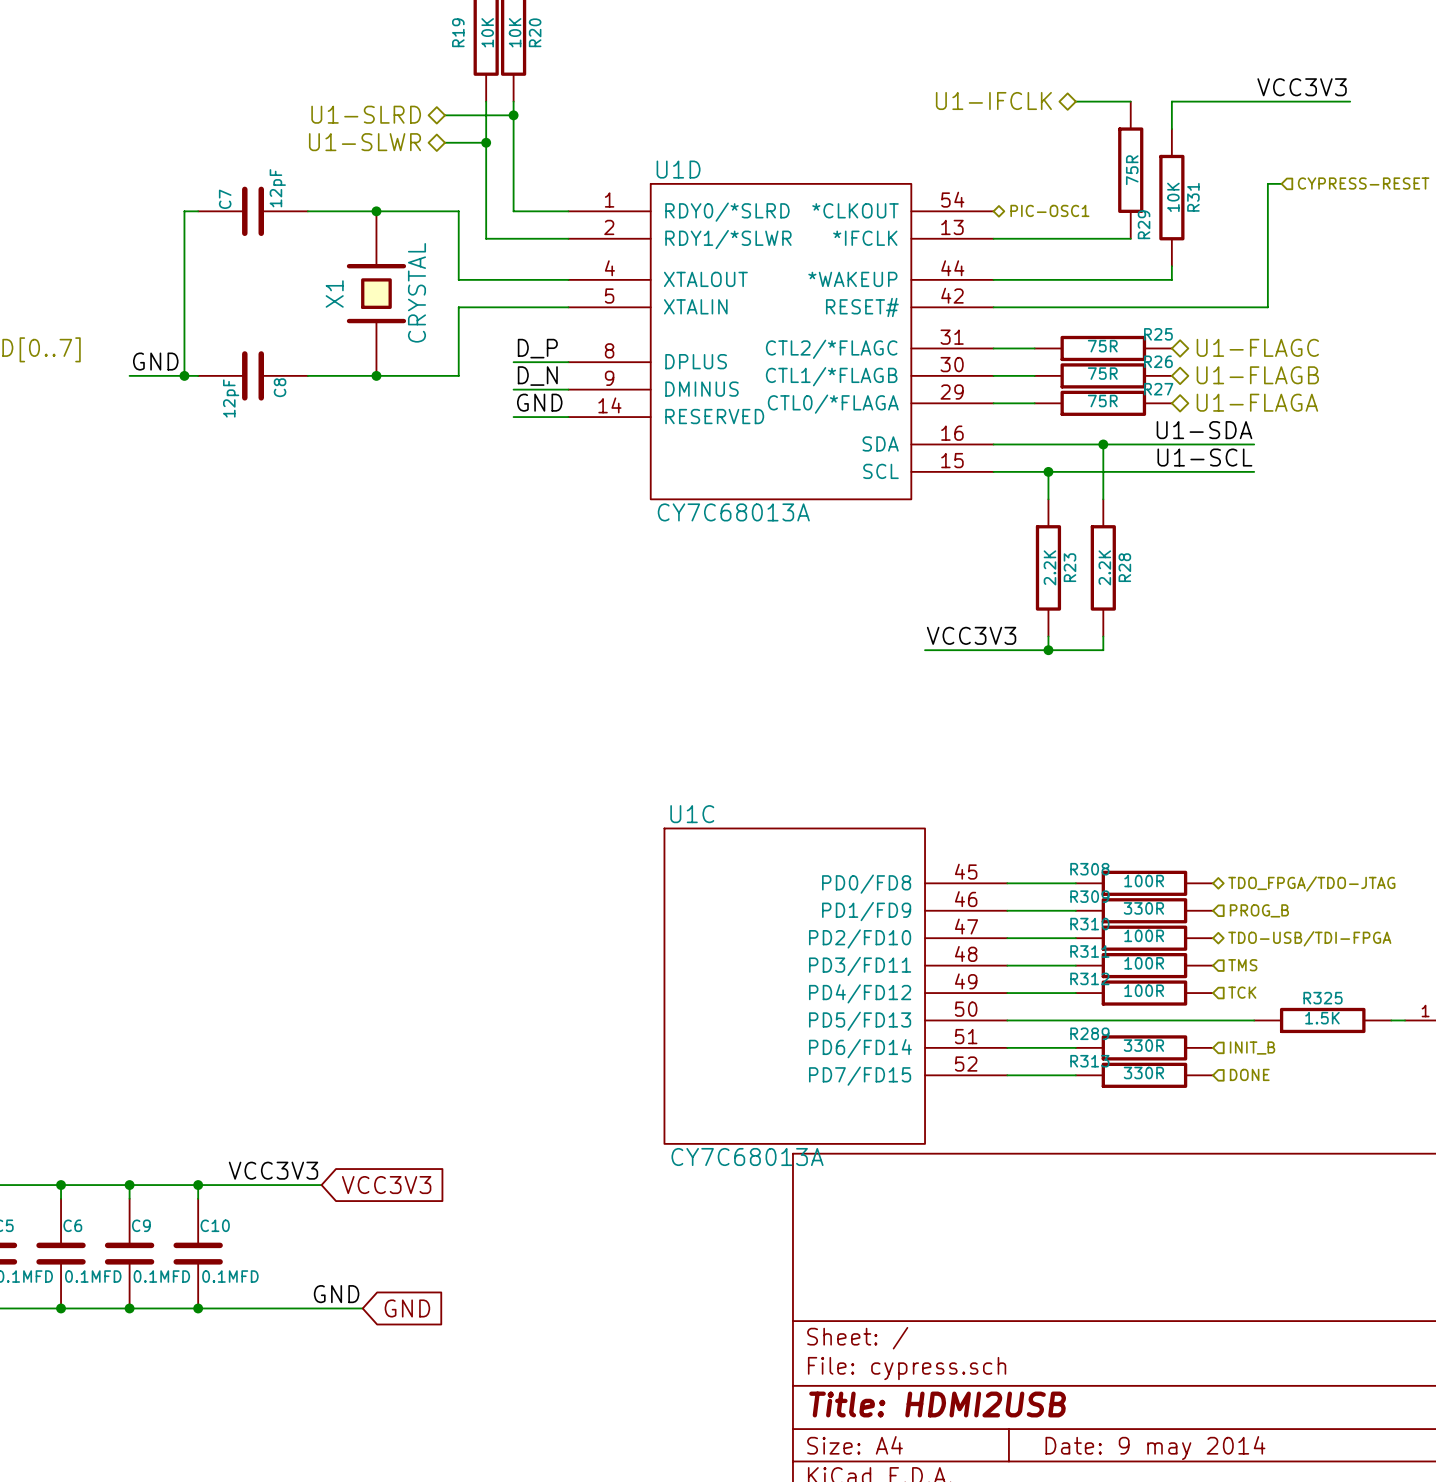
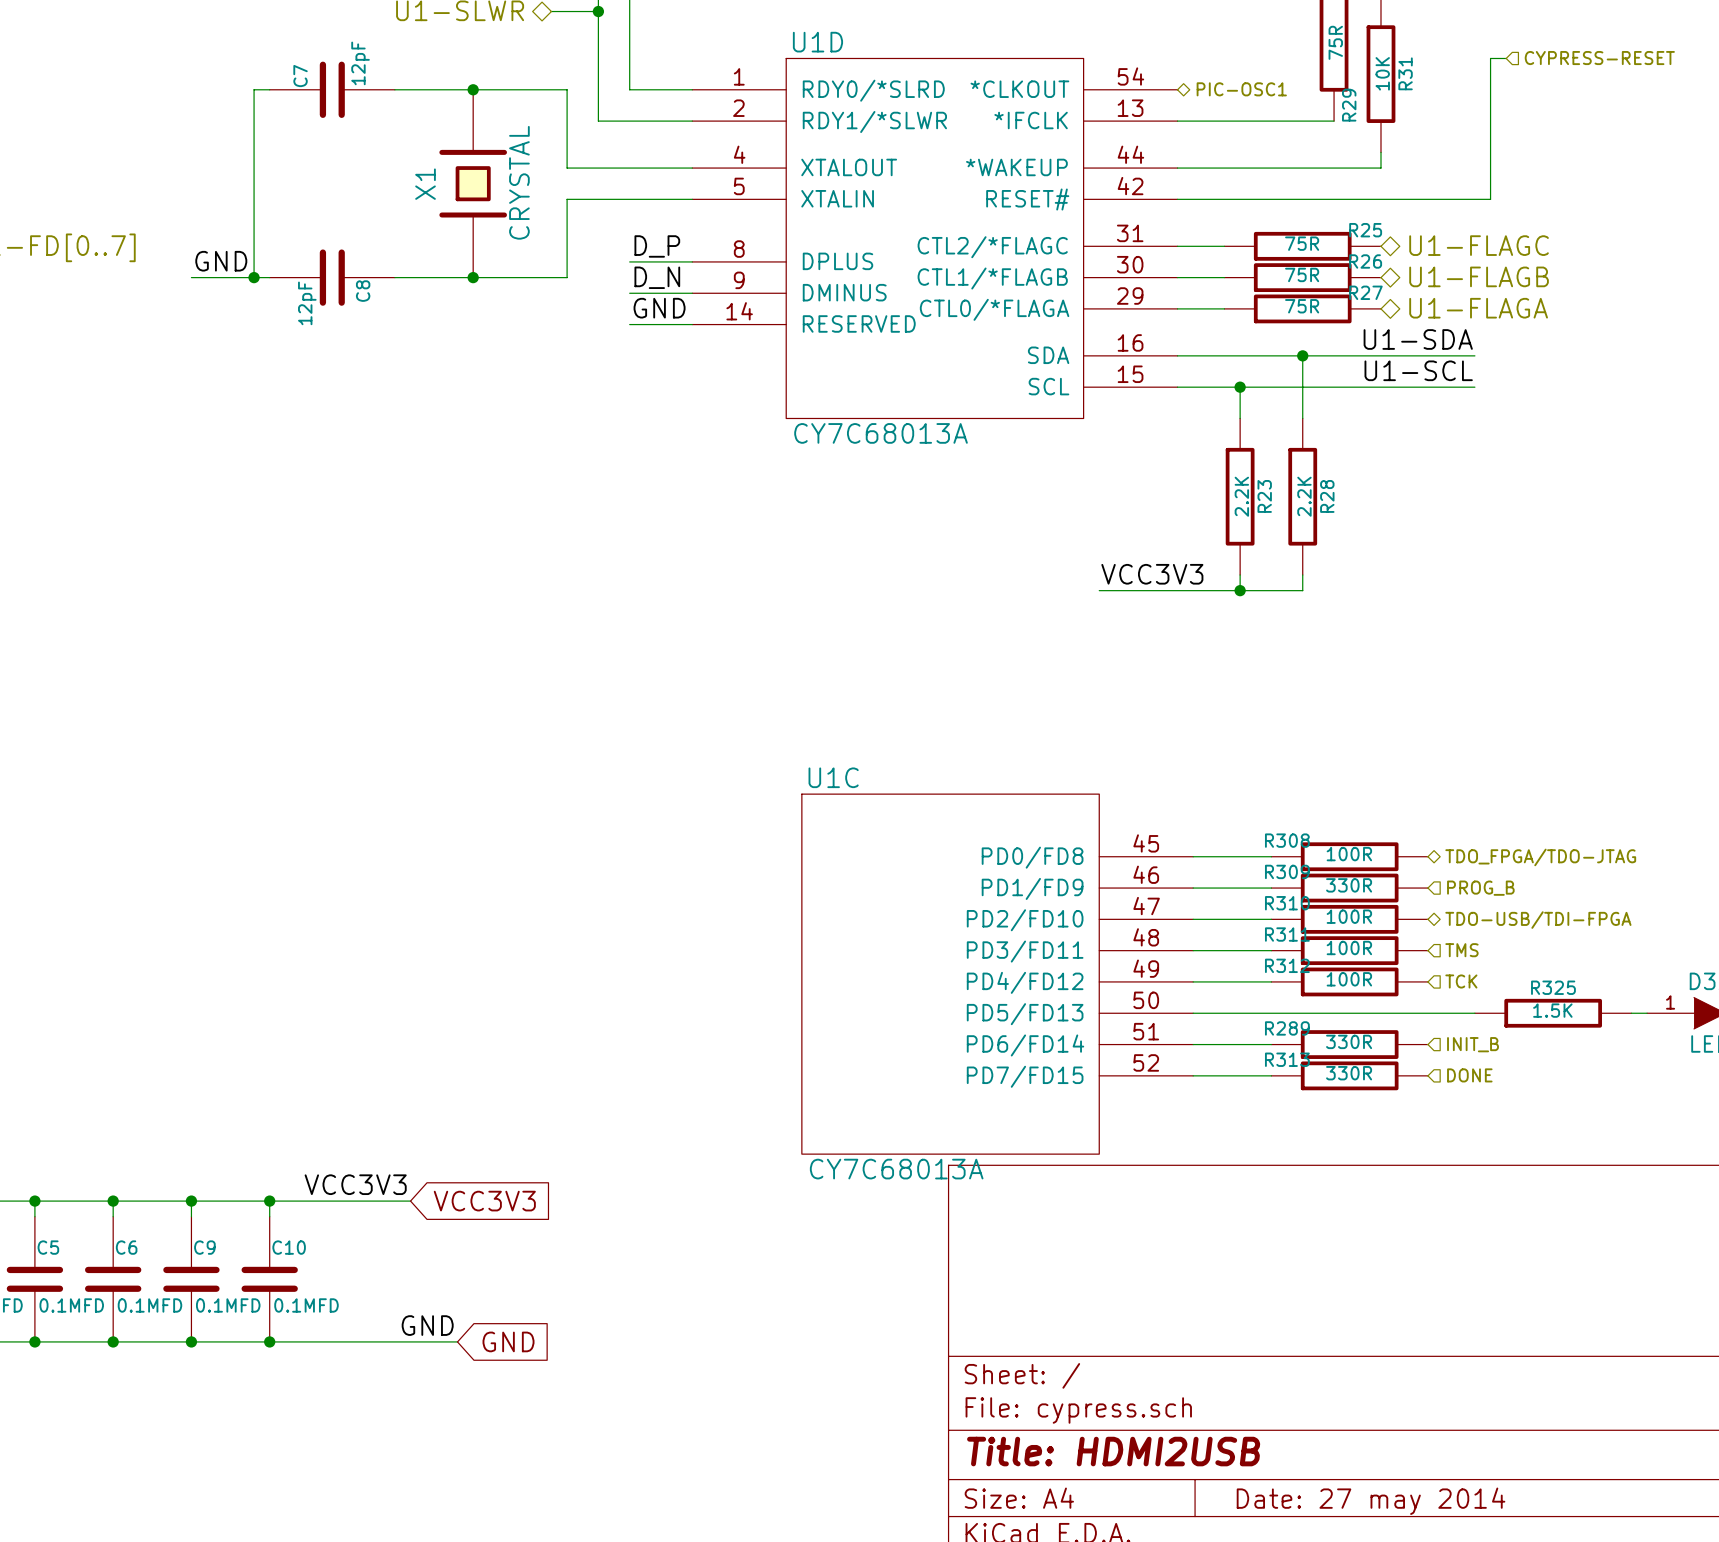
title block: Date: 9 may 2014 (1155, 1448) -> Date: 27 may 2014 (1371, 1501)

